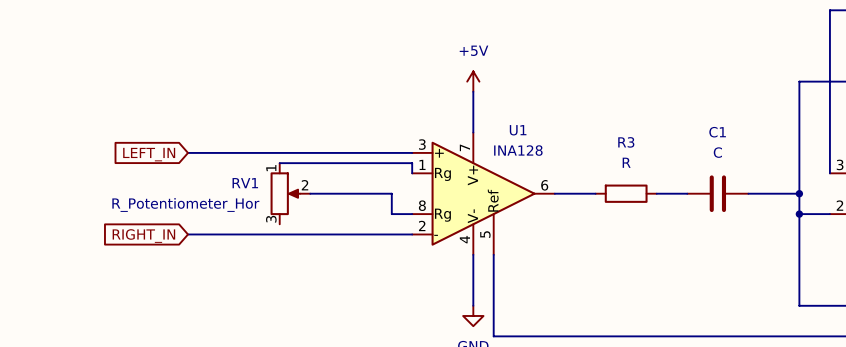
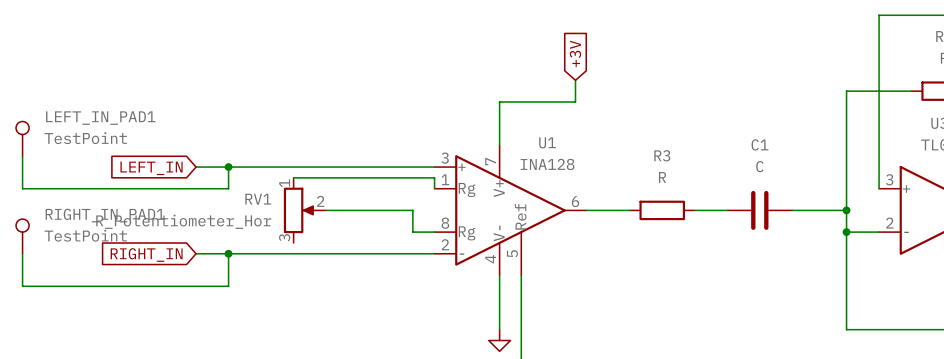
global label: none -> +3V (575, 53)
wire: none -> (575, 80) (575, 101) (499, 101)
power symbol: +5V (473, 81) -> none
LEFT_IN_PAD1: none -> TestPoint (22, 138)
wire: none -> (22, 156) (22, 188) (228, 188) (228, 167)
junction: none -> (228, 167)
RIGHT_IN_PAD1: none -> TestPoint (22, 236)
wire: none -> (22, 253) (22, 286) (228, 286) (228, 253)
junction: none -> (228, 253)

